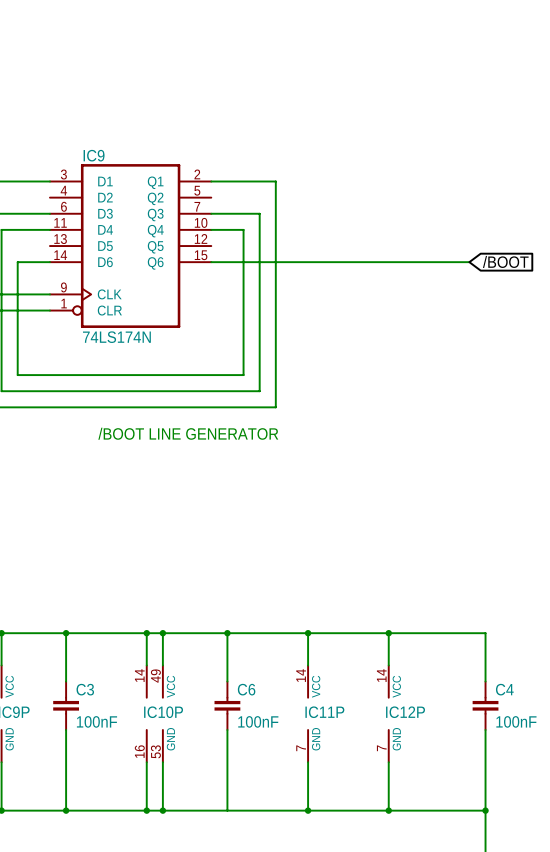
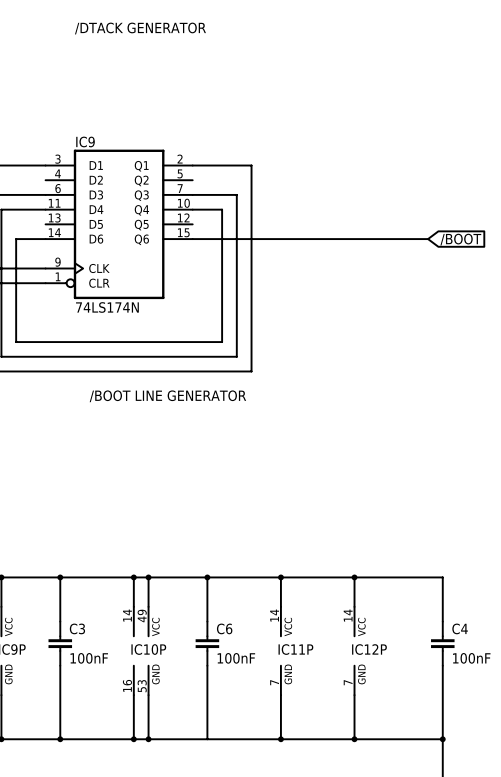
text: none -> /DTACK GENERATOR (140, 28)

